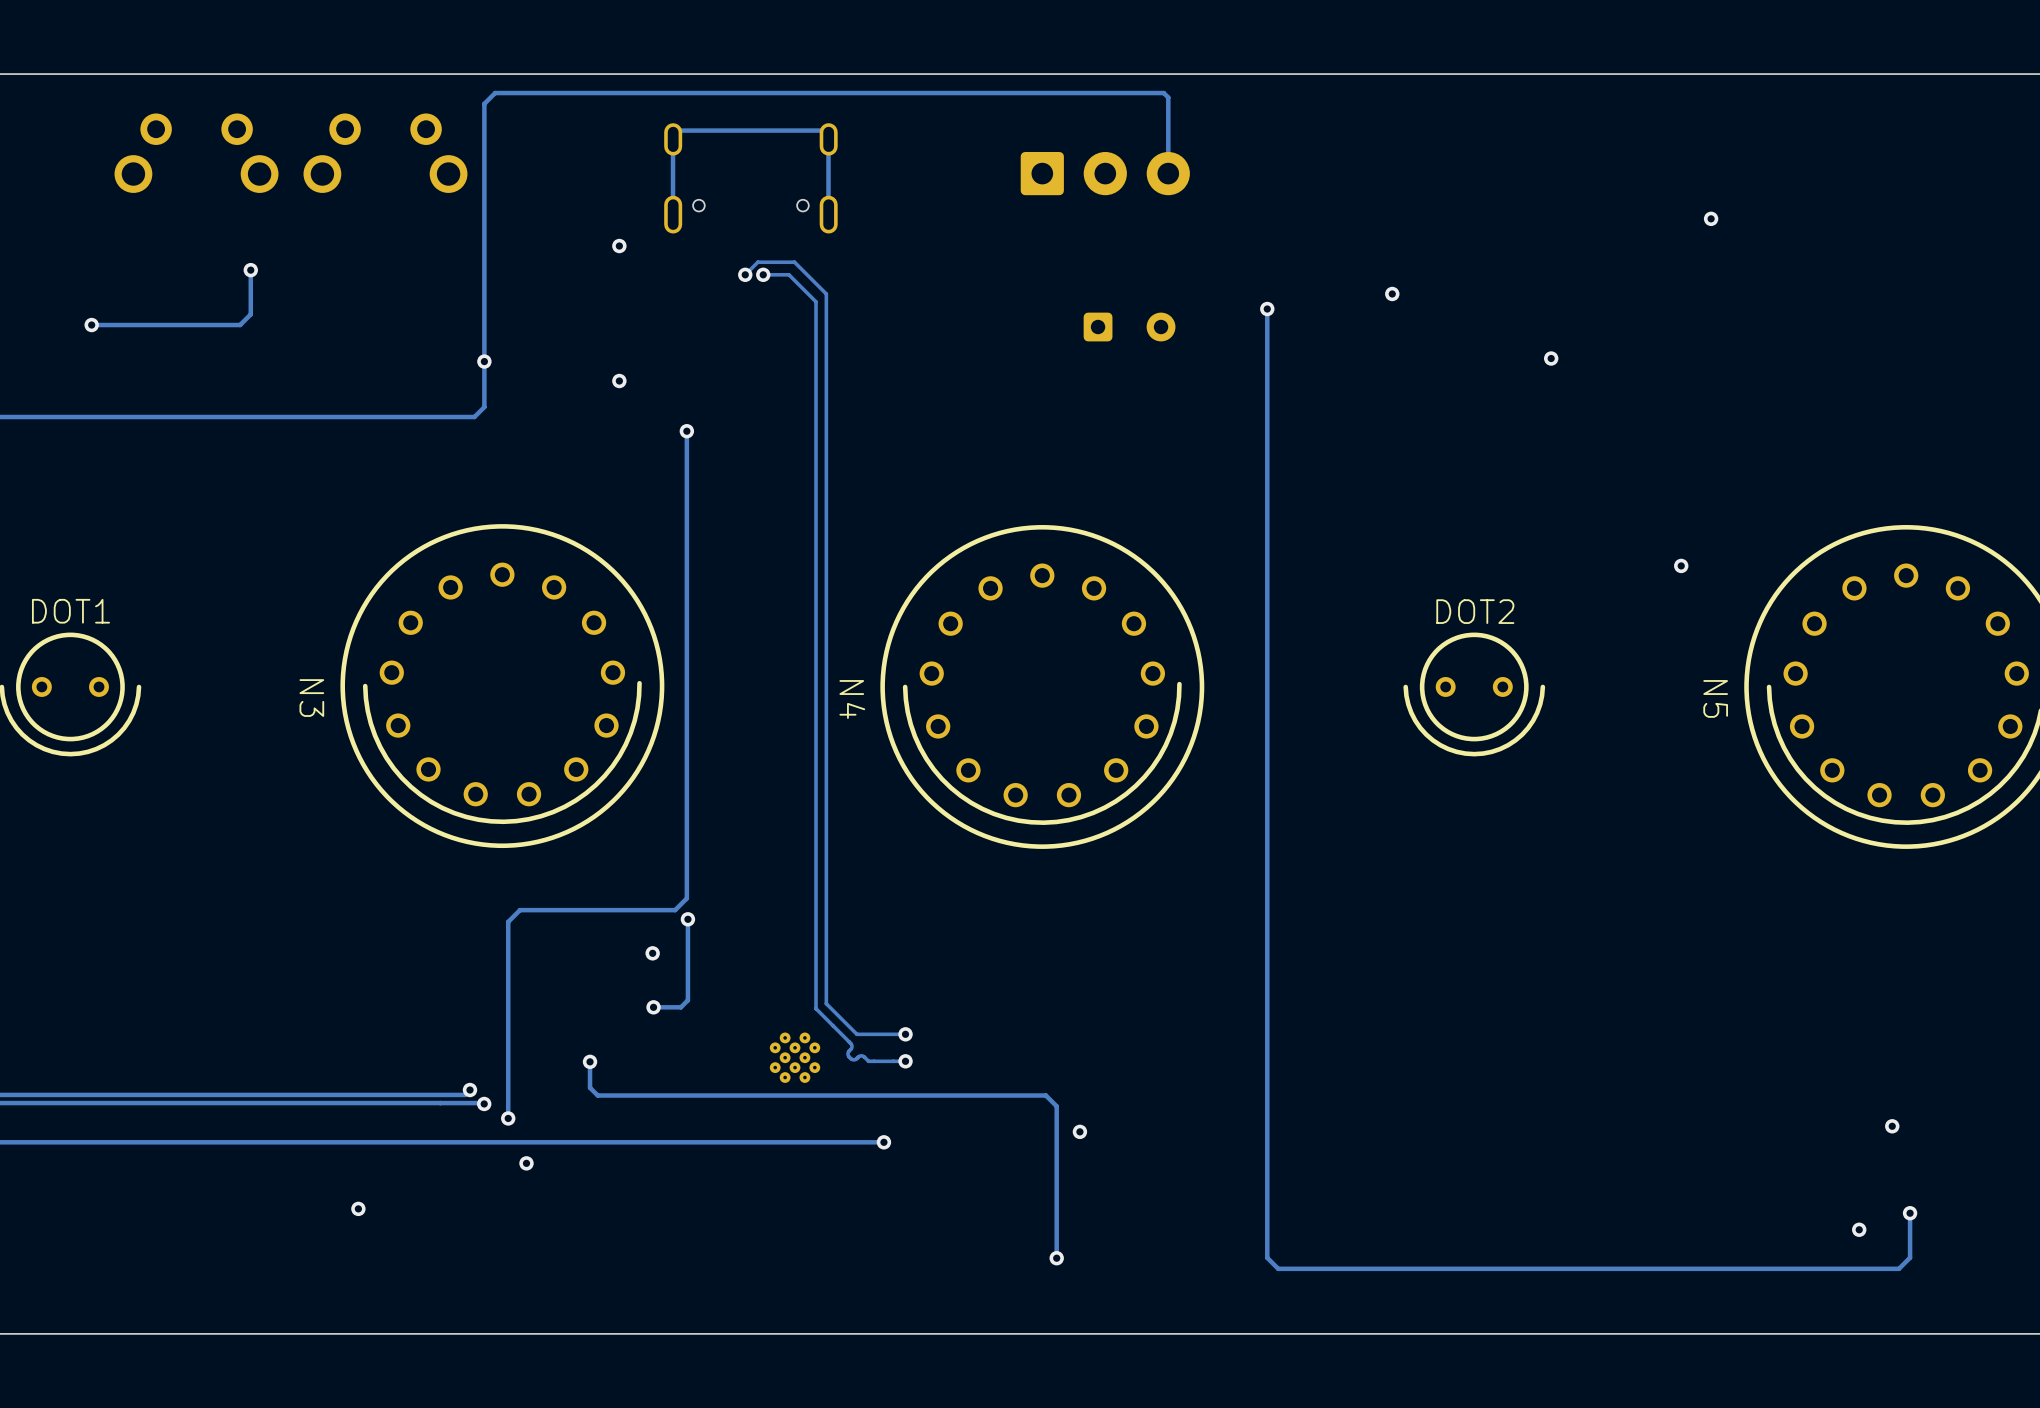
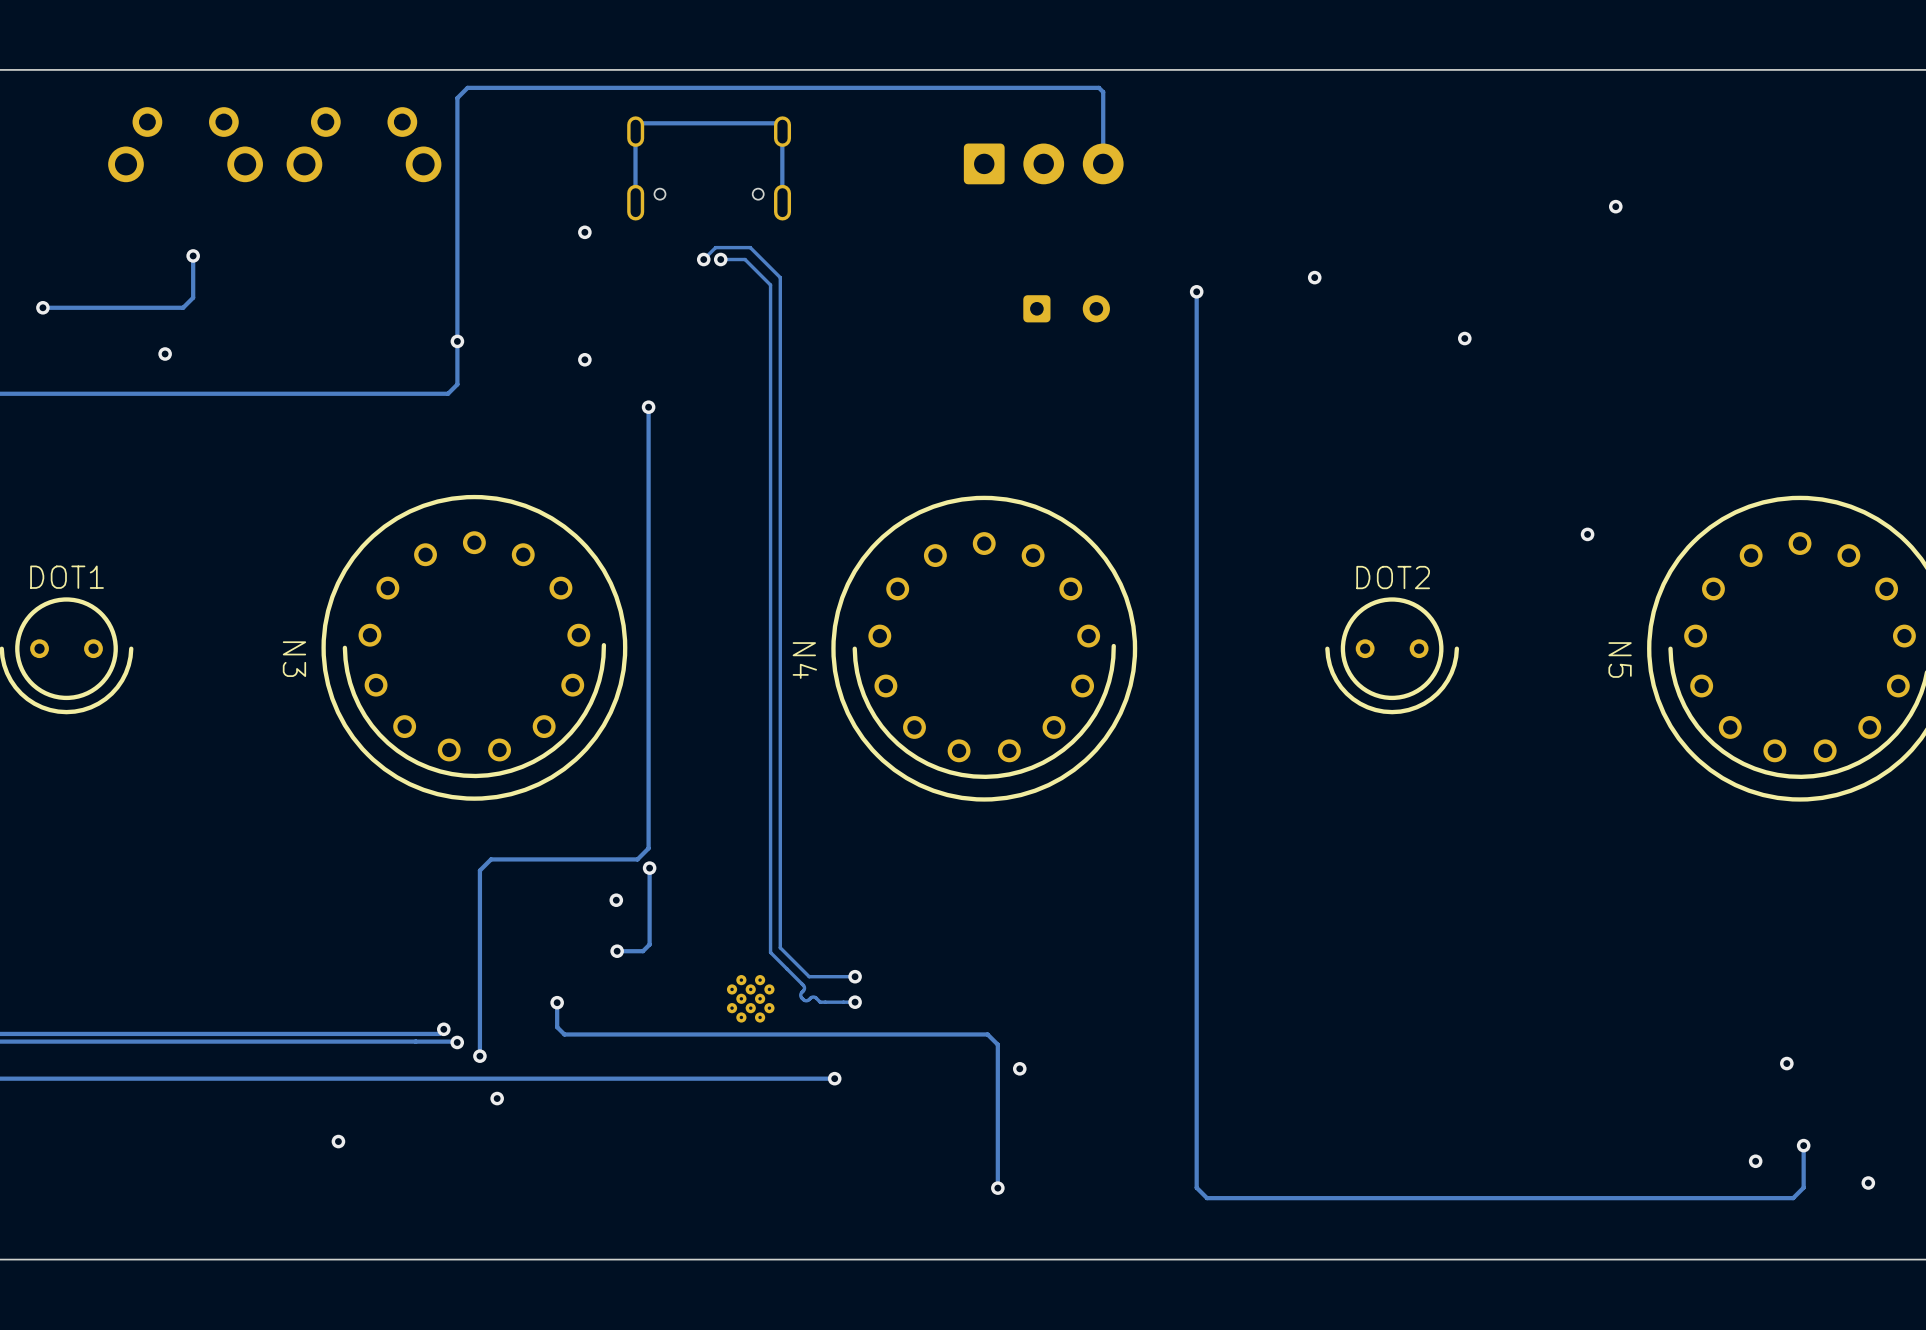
track: (250, 270) (250, 314) (240, 325) (91, 325) -> (193, 255) (193, 297) (183, 307) (42, 307)
via position: (250, 270) -> (193, 255)
via position: (91, 325) -> (42, 307)
via: none -> (165, 354)
via: none -> (1868, 1183)

